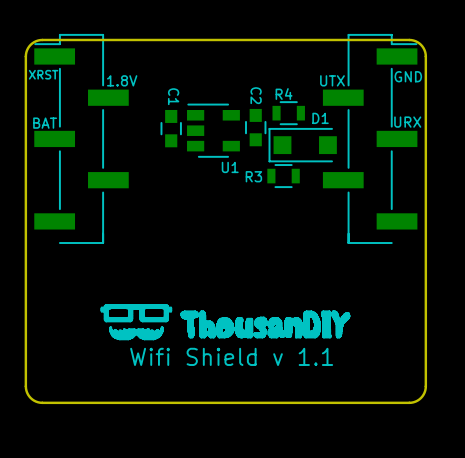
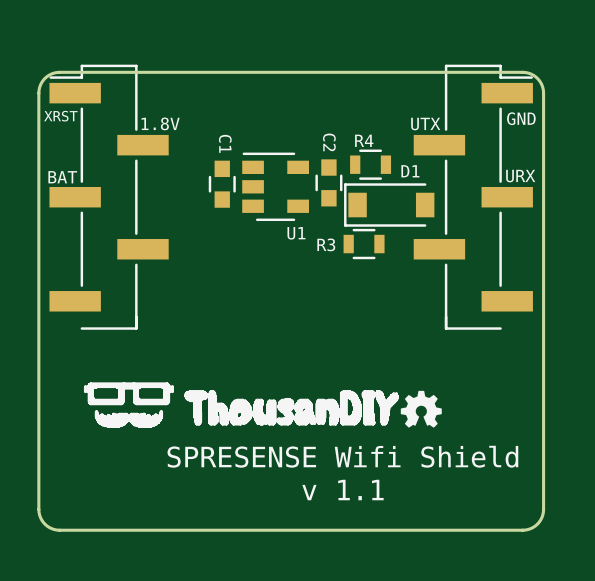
D1 footprint: [268, 127, 337, 163] -> [344, 183, 435, 227]
drawing: none -> [400, 390, 442, 428]
drawing position: (225, 322) -> (241, 405)
text: none -> SPRESENSE Wifi Shield (342, 456)
text: Wifi Shield v 1.1 (231, 356) -> none
text: none -> v 1.1 (342, 490)

